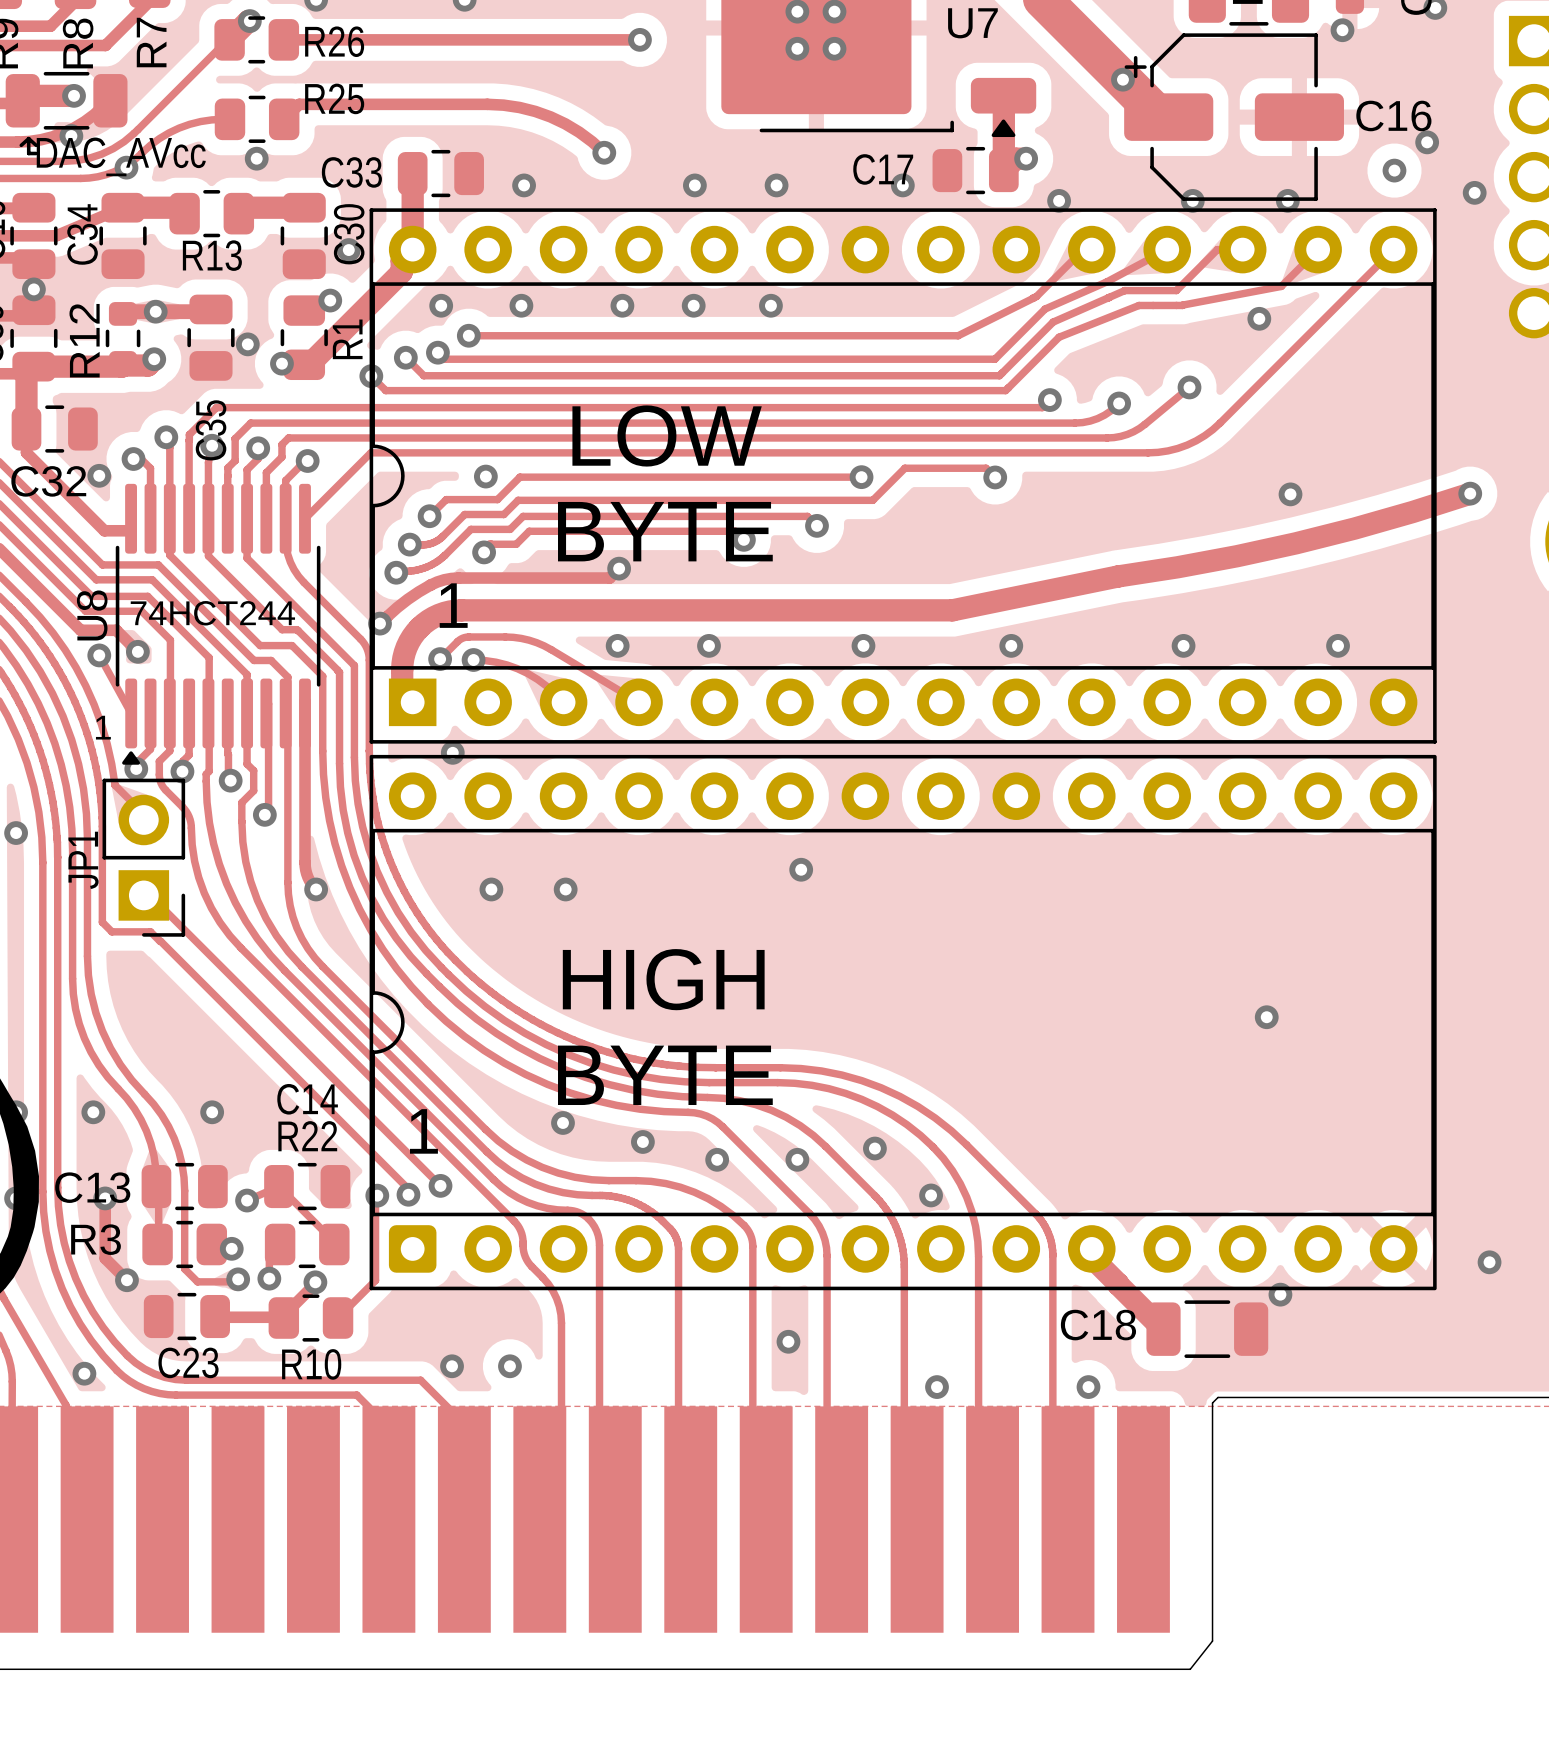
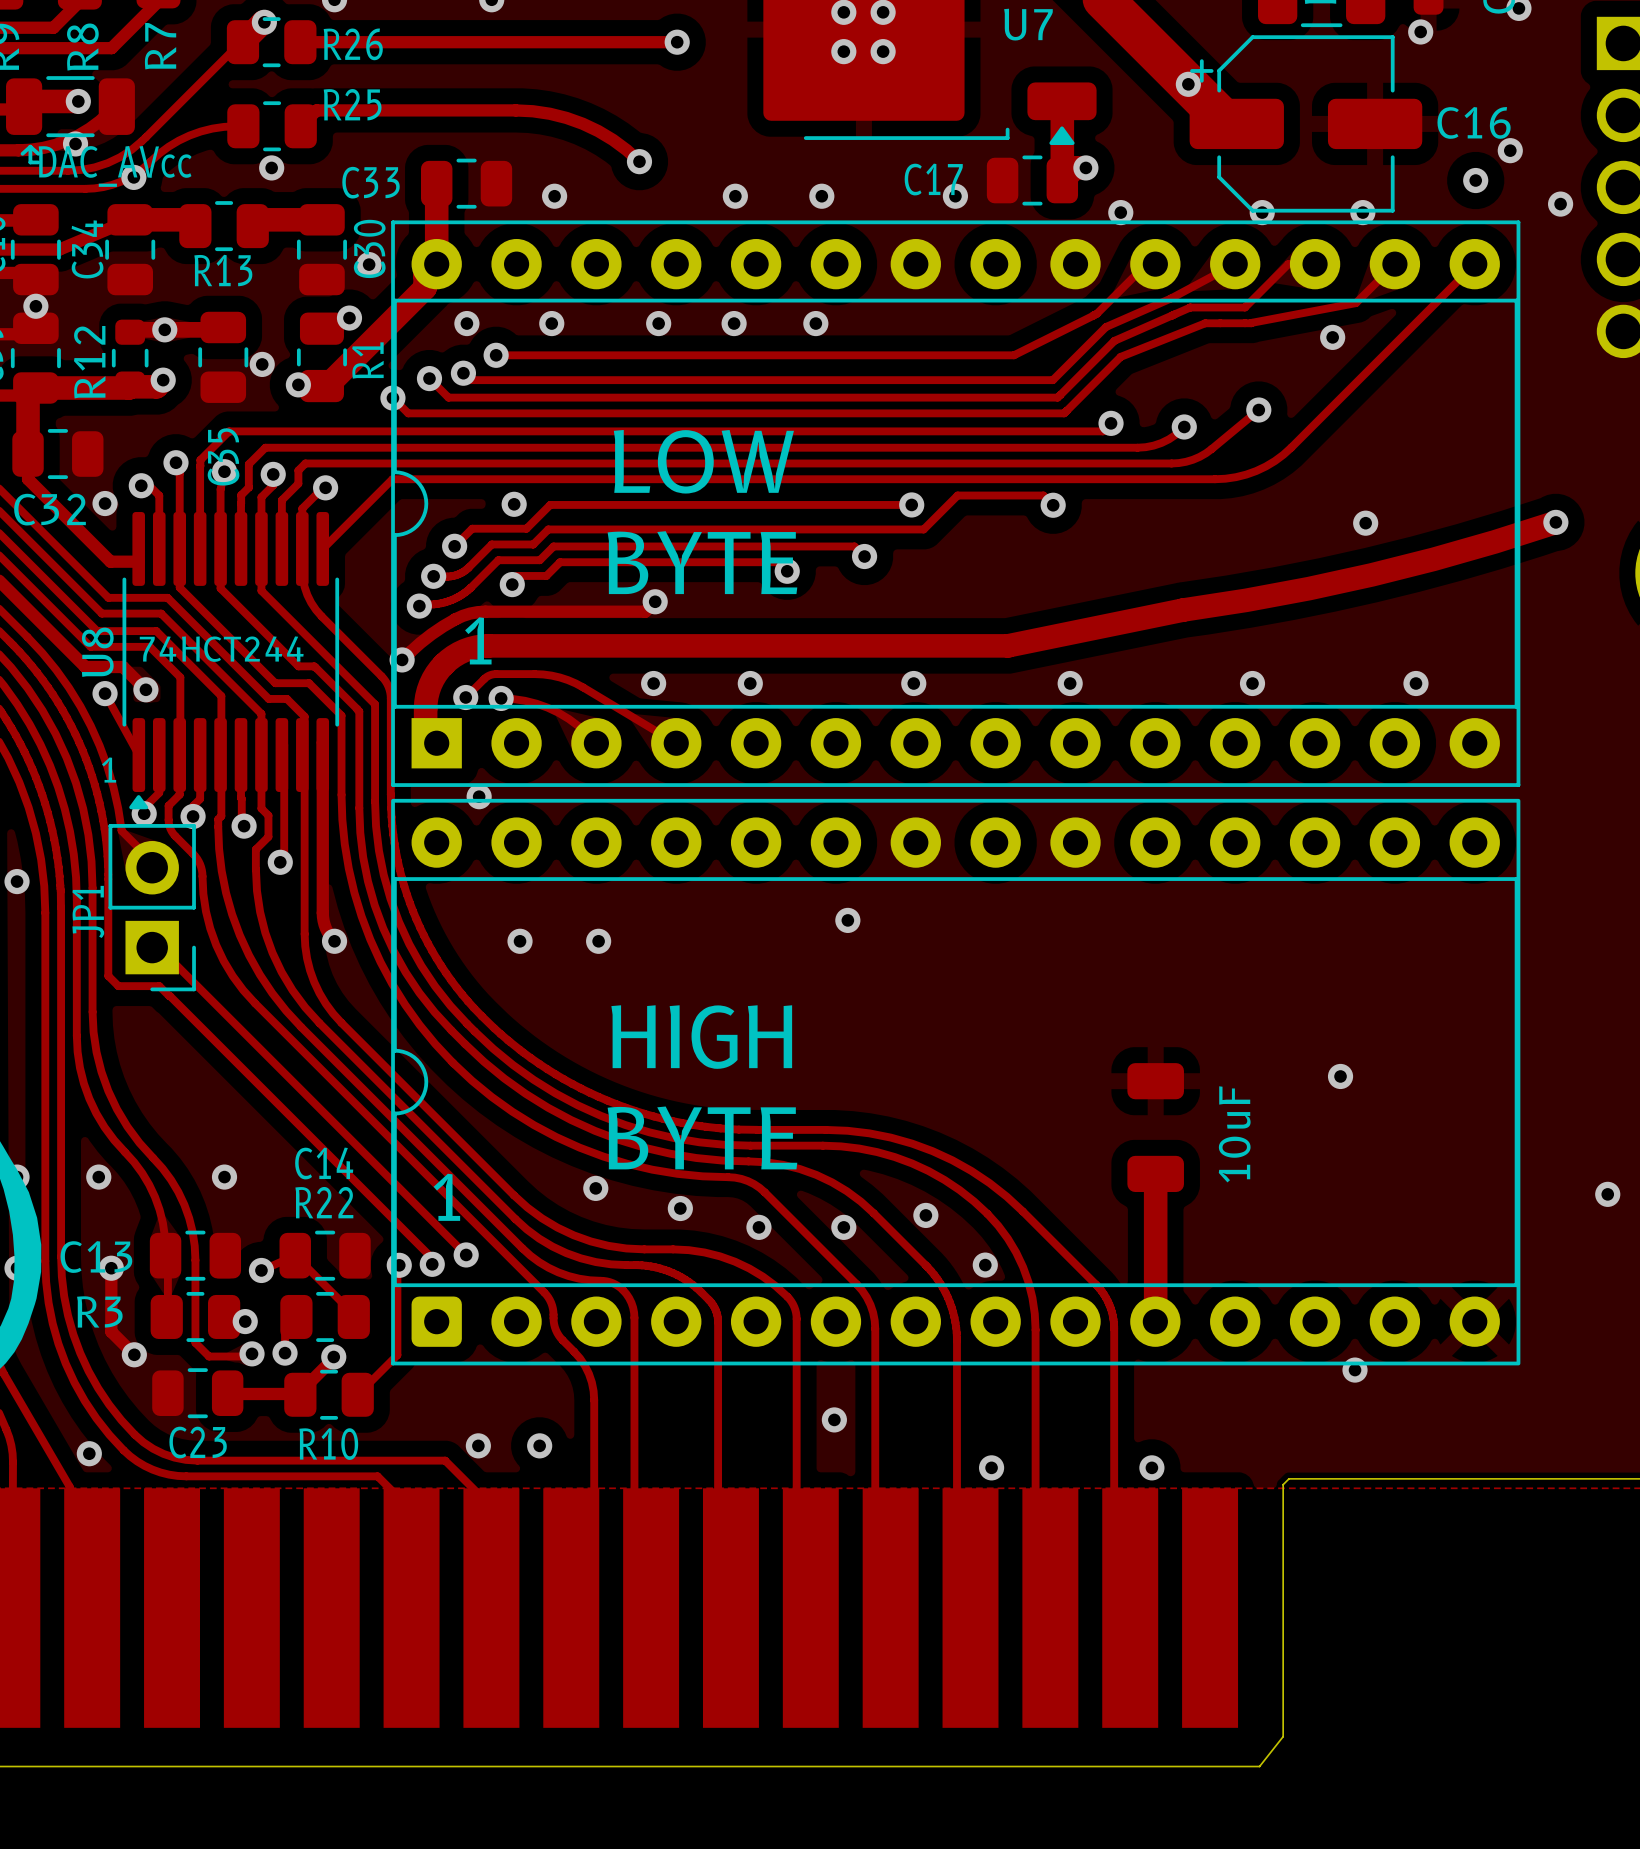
part footprint: [369, 754, 1437, 1291] -> [391, 798, 1521, 1366]
text: none -> 10uF (1234, 1134)
track: none -> (1155, 1173) (1155, 1321)
track: (1091, 1257) (1163, 1329) -> none
via position: (1489, 1262) -> (1607, 1194)
C18: (1207, 1329) -> none

